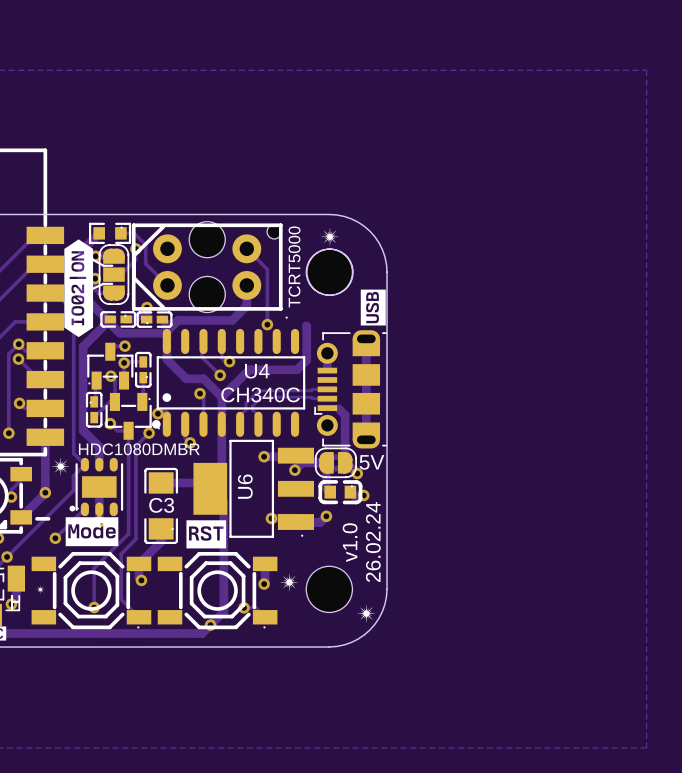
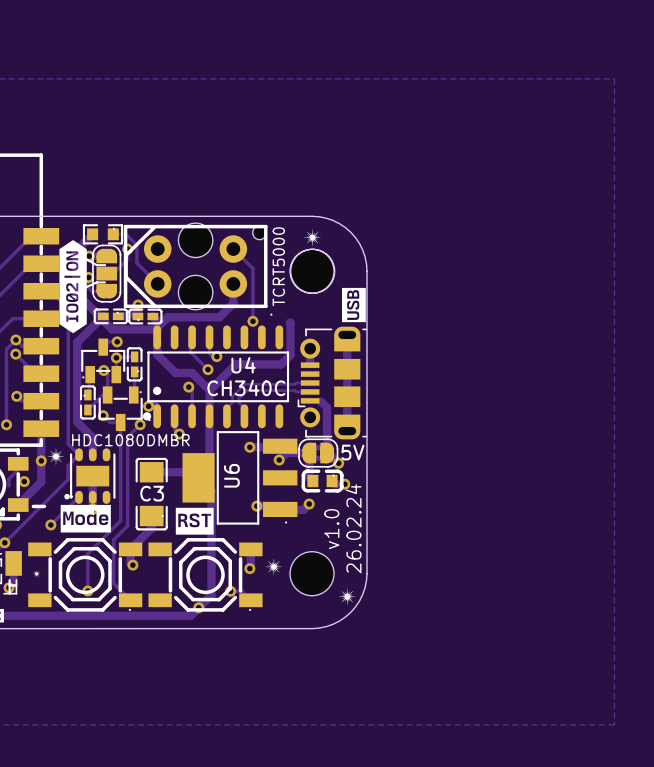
via: none -> (41, 460)
via: none -> (24, 481)
via: (45, 492) -> none
via: (11, 497) -> none

